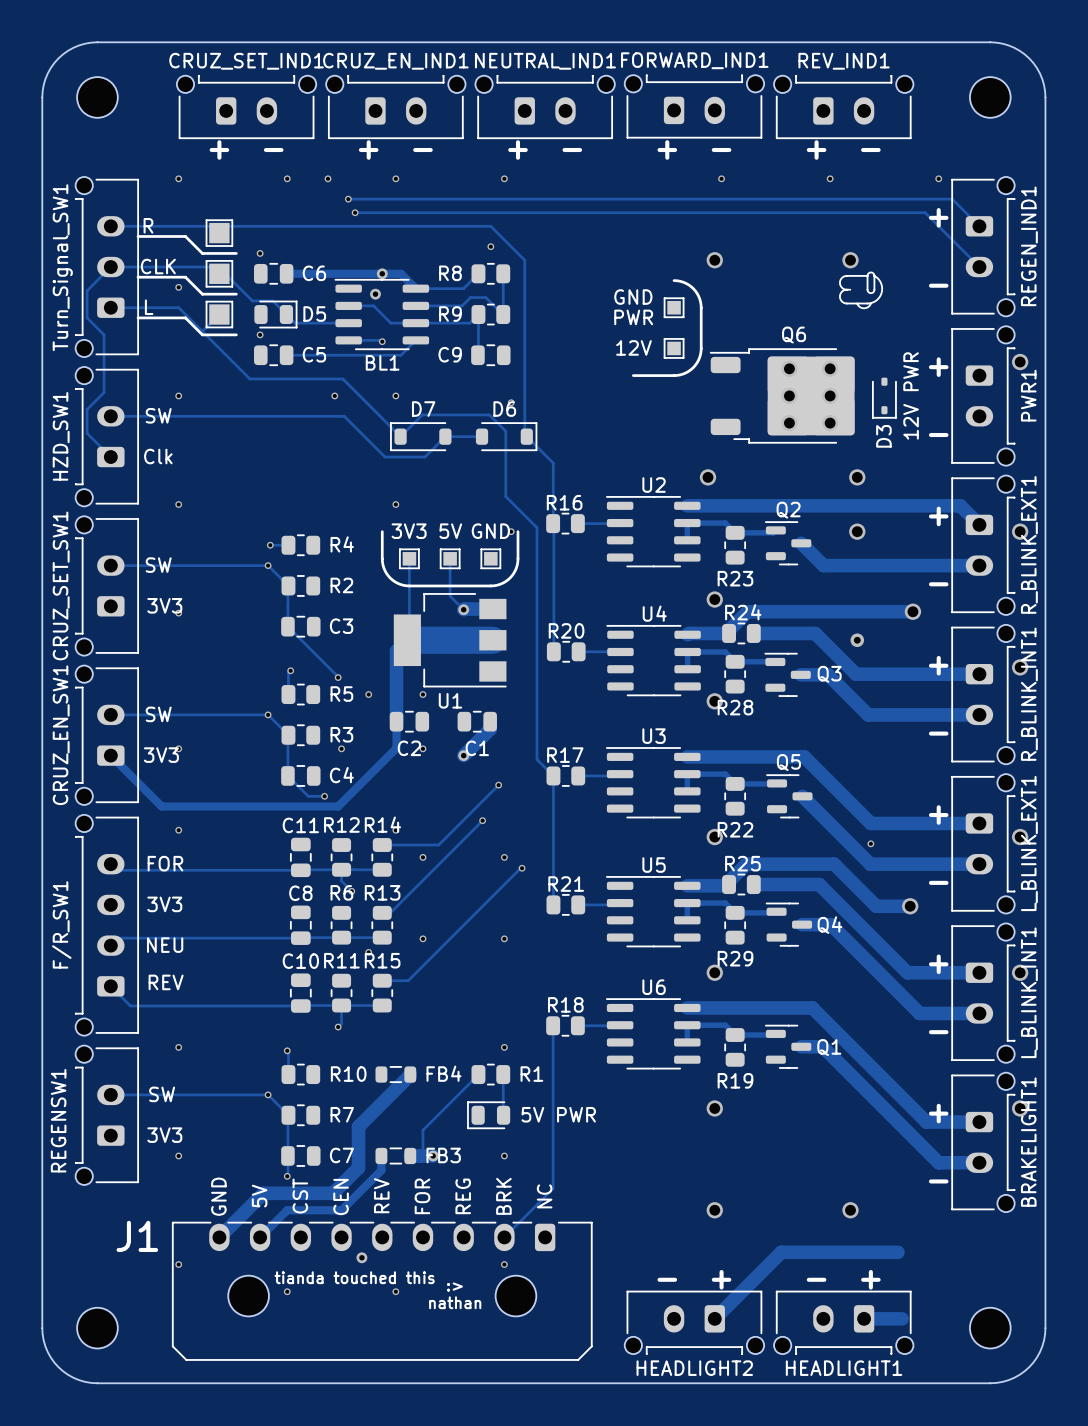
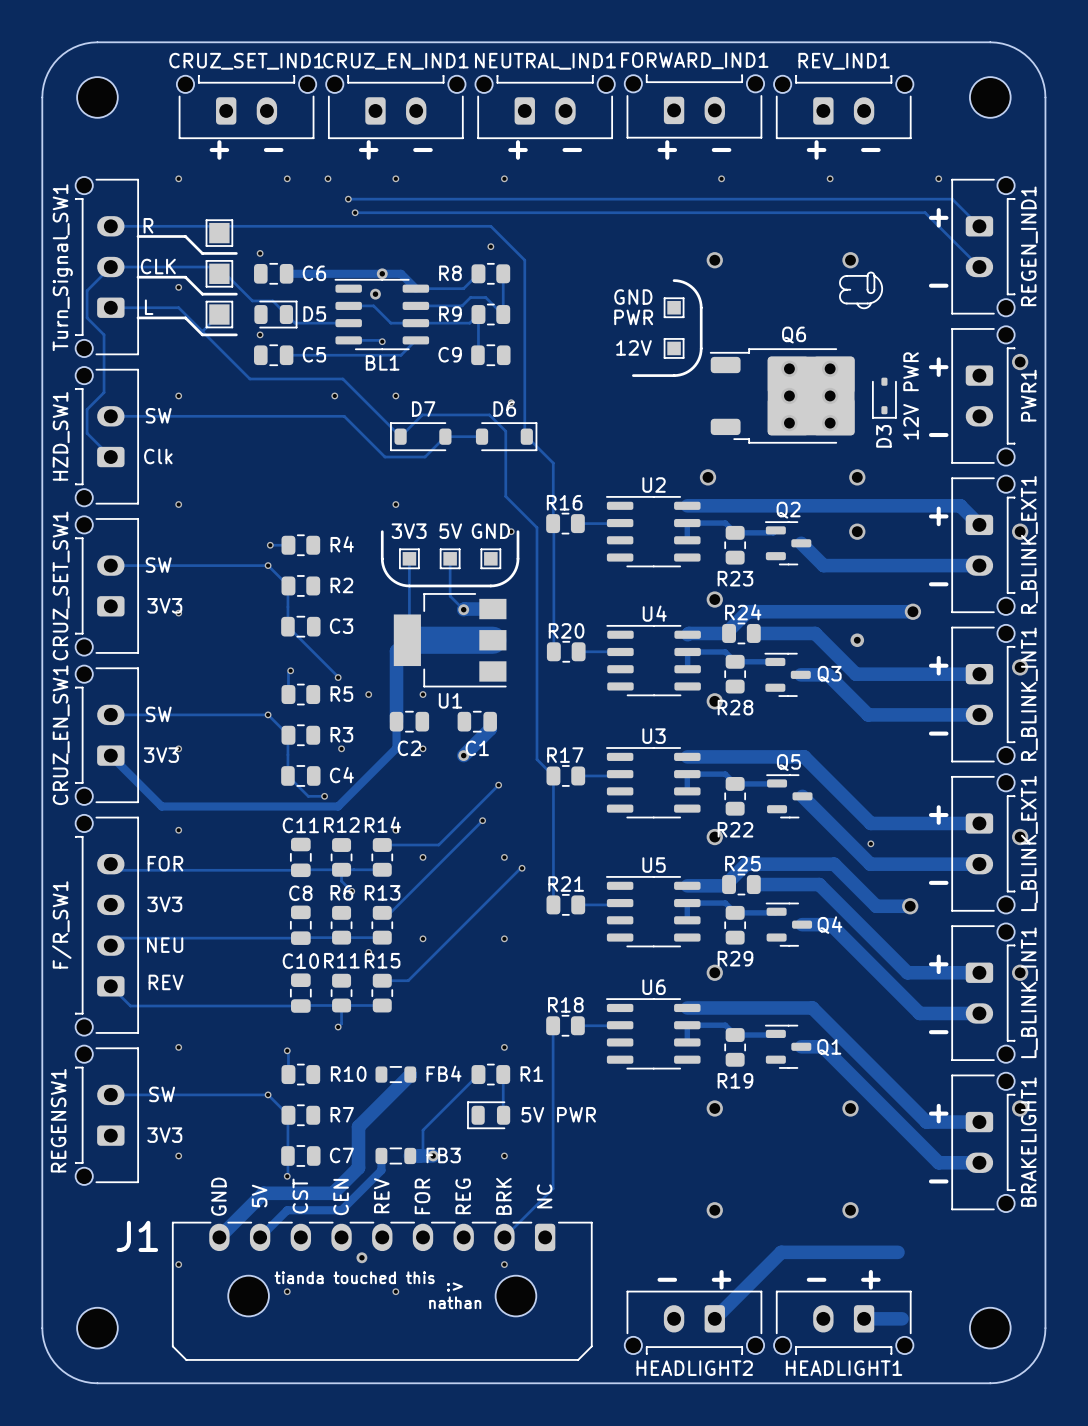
via: none -> (850, 1108)

